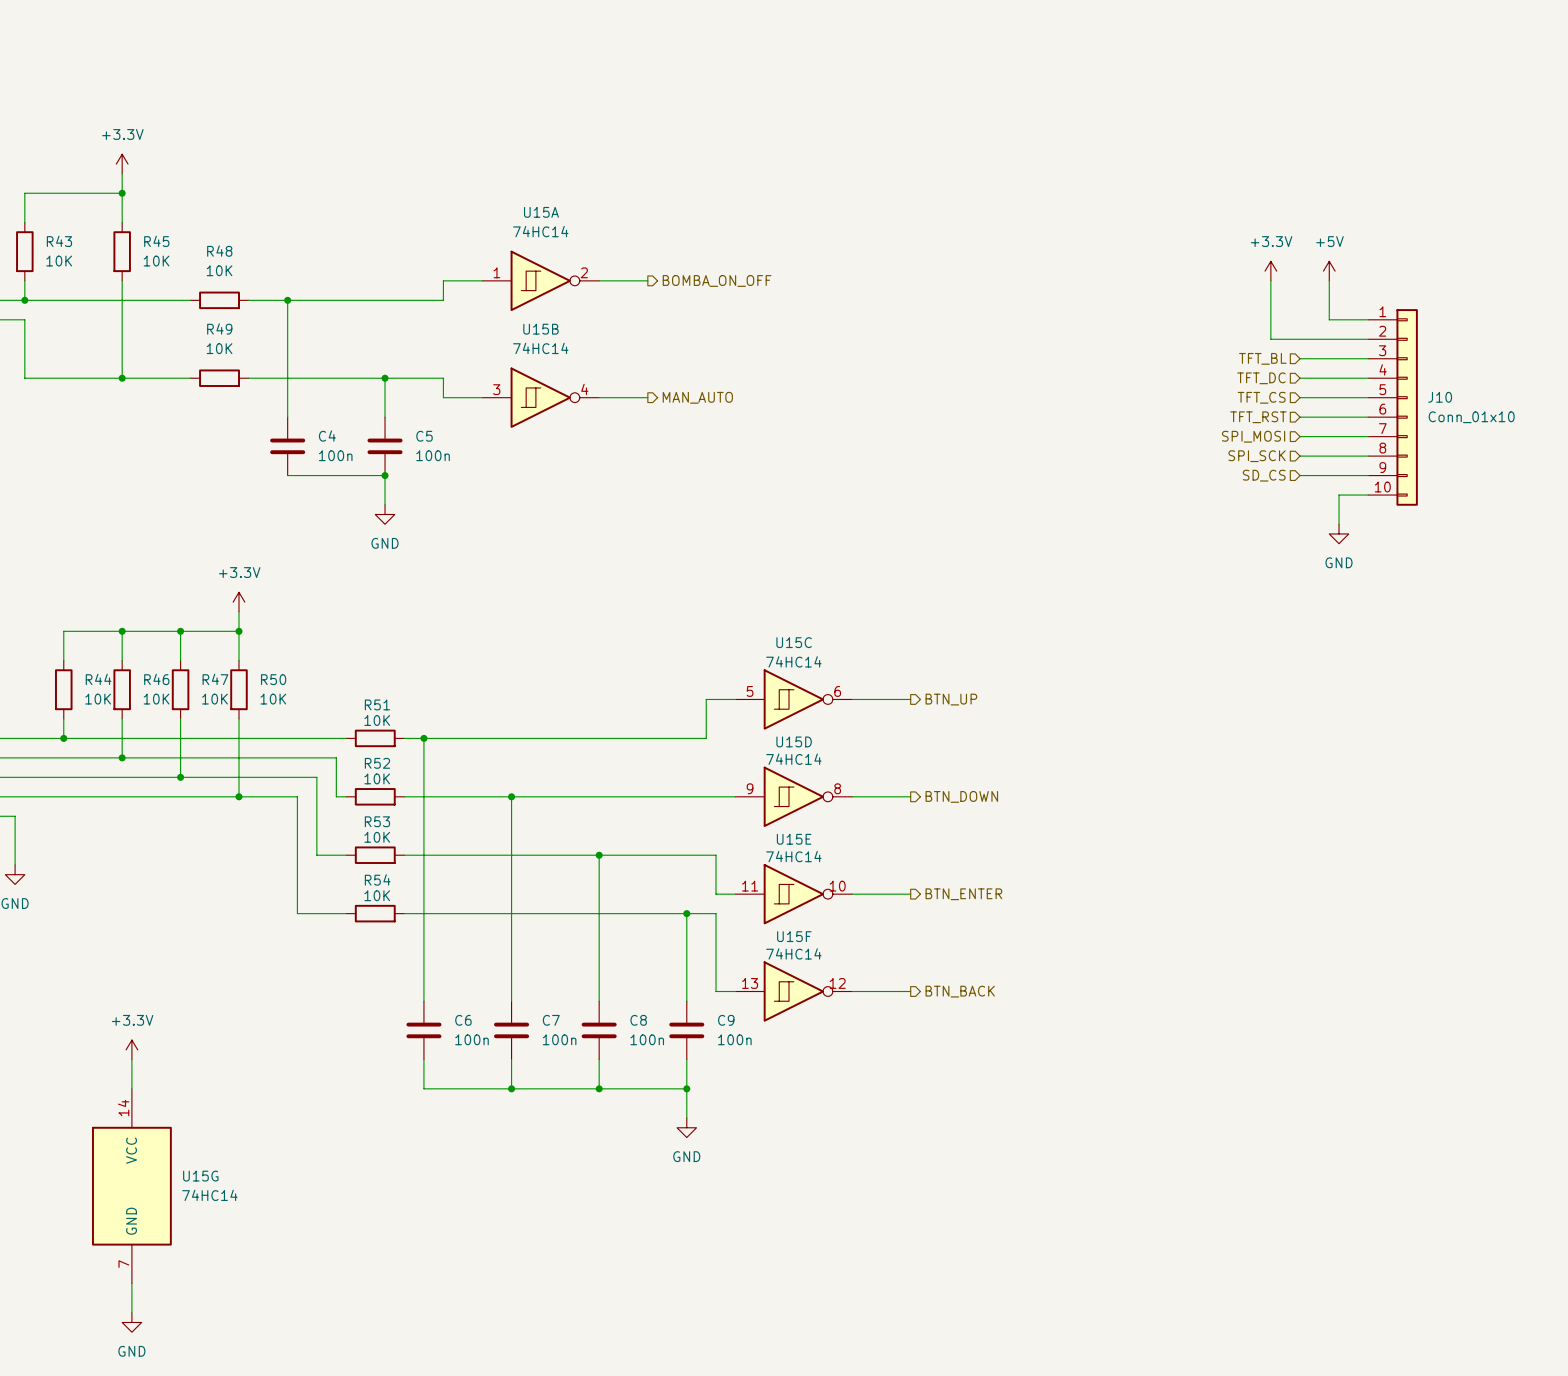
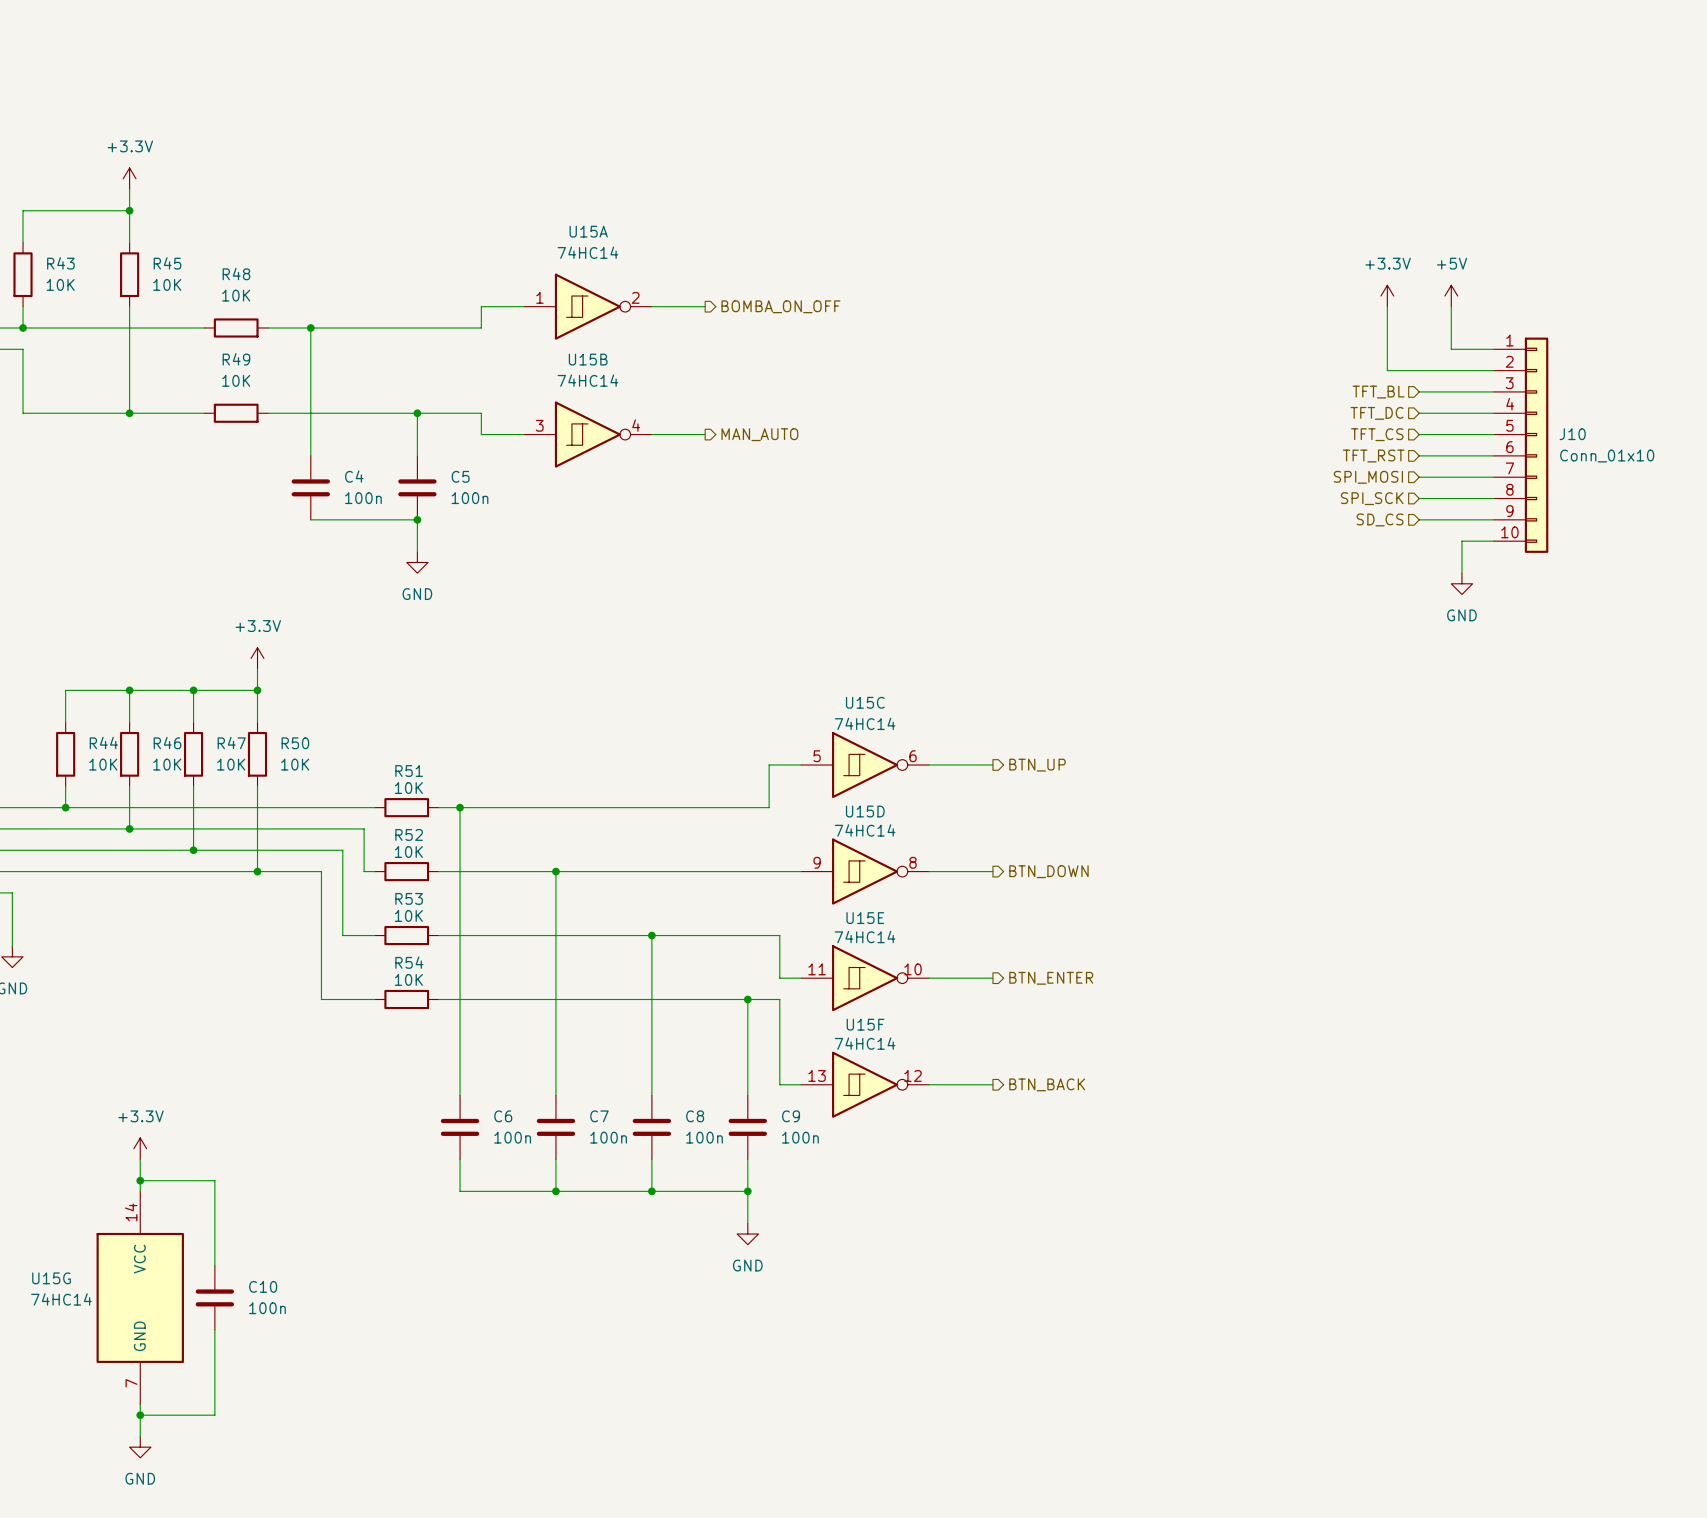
wire: none -> (140, 1180) (214, 1180) (214, 1265)
junction: none -> (140, 1180)
U15G name position: U15G (200, 1176) -> U15G (51, 1278)
C10: none -> 100n (214, 1297)
U15G value position: 74HC14 (209, 1195) -> 74HC14 (61, 1299)
wire: none -> (214, 1329) (214, 1415) (140, 1415)
junction: none -> (140, 1415)

